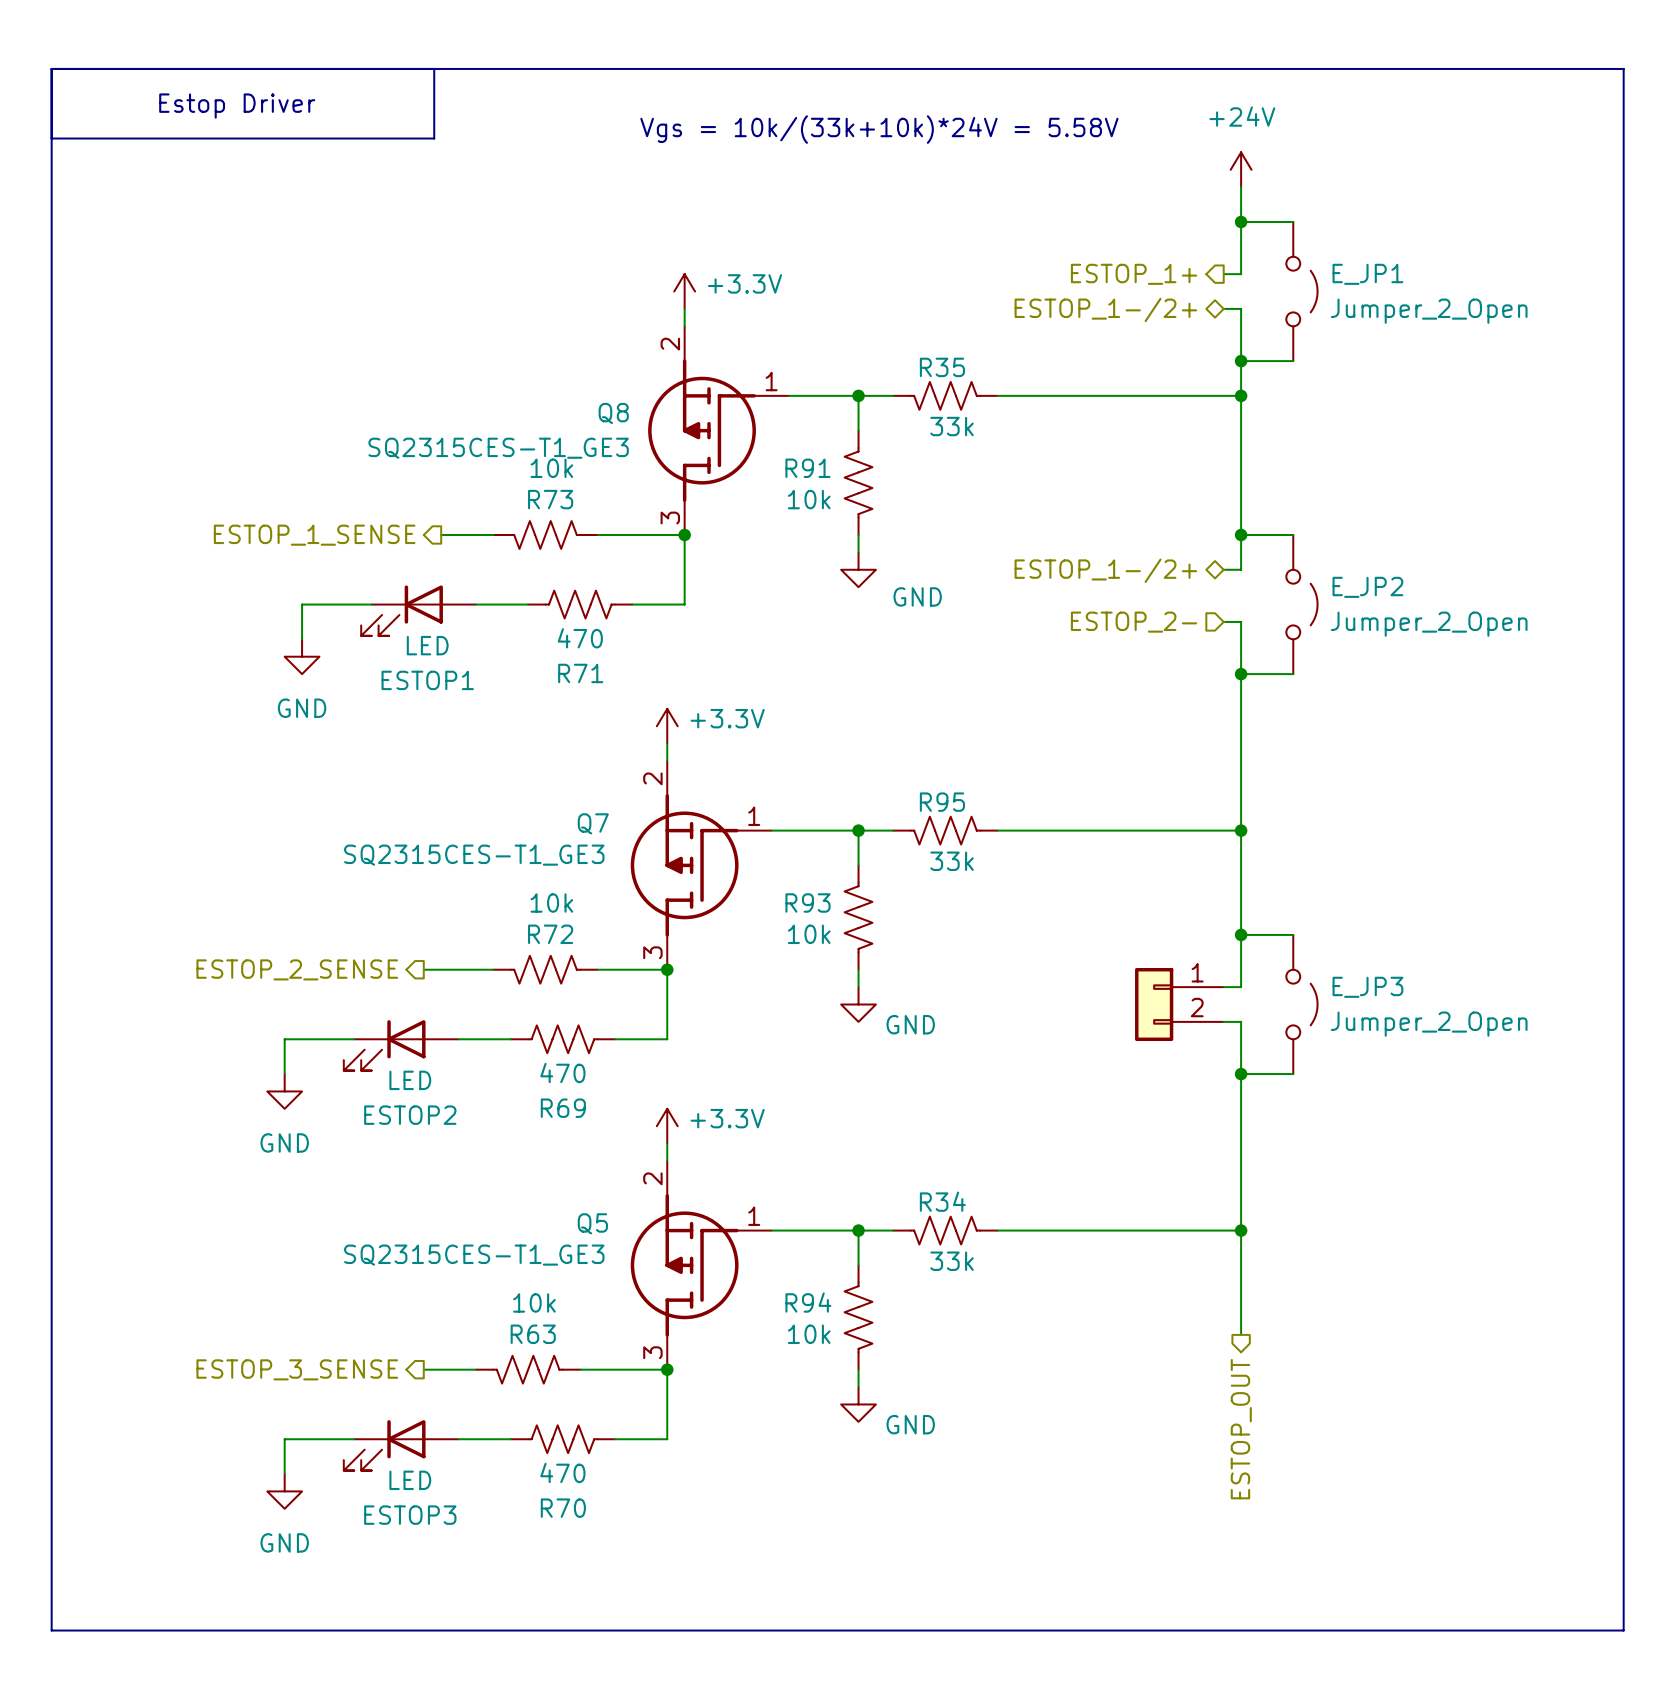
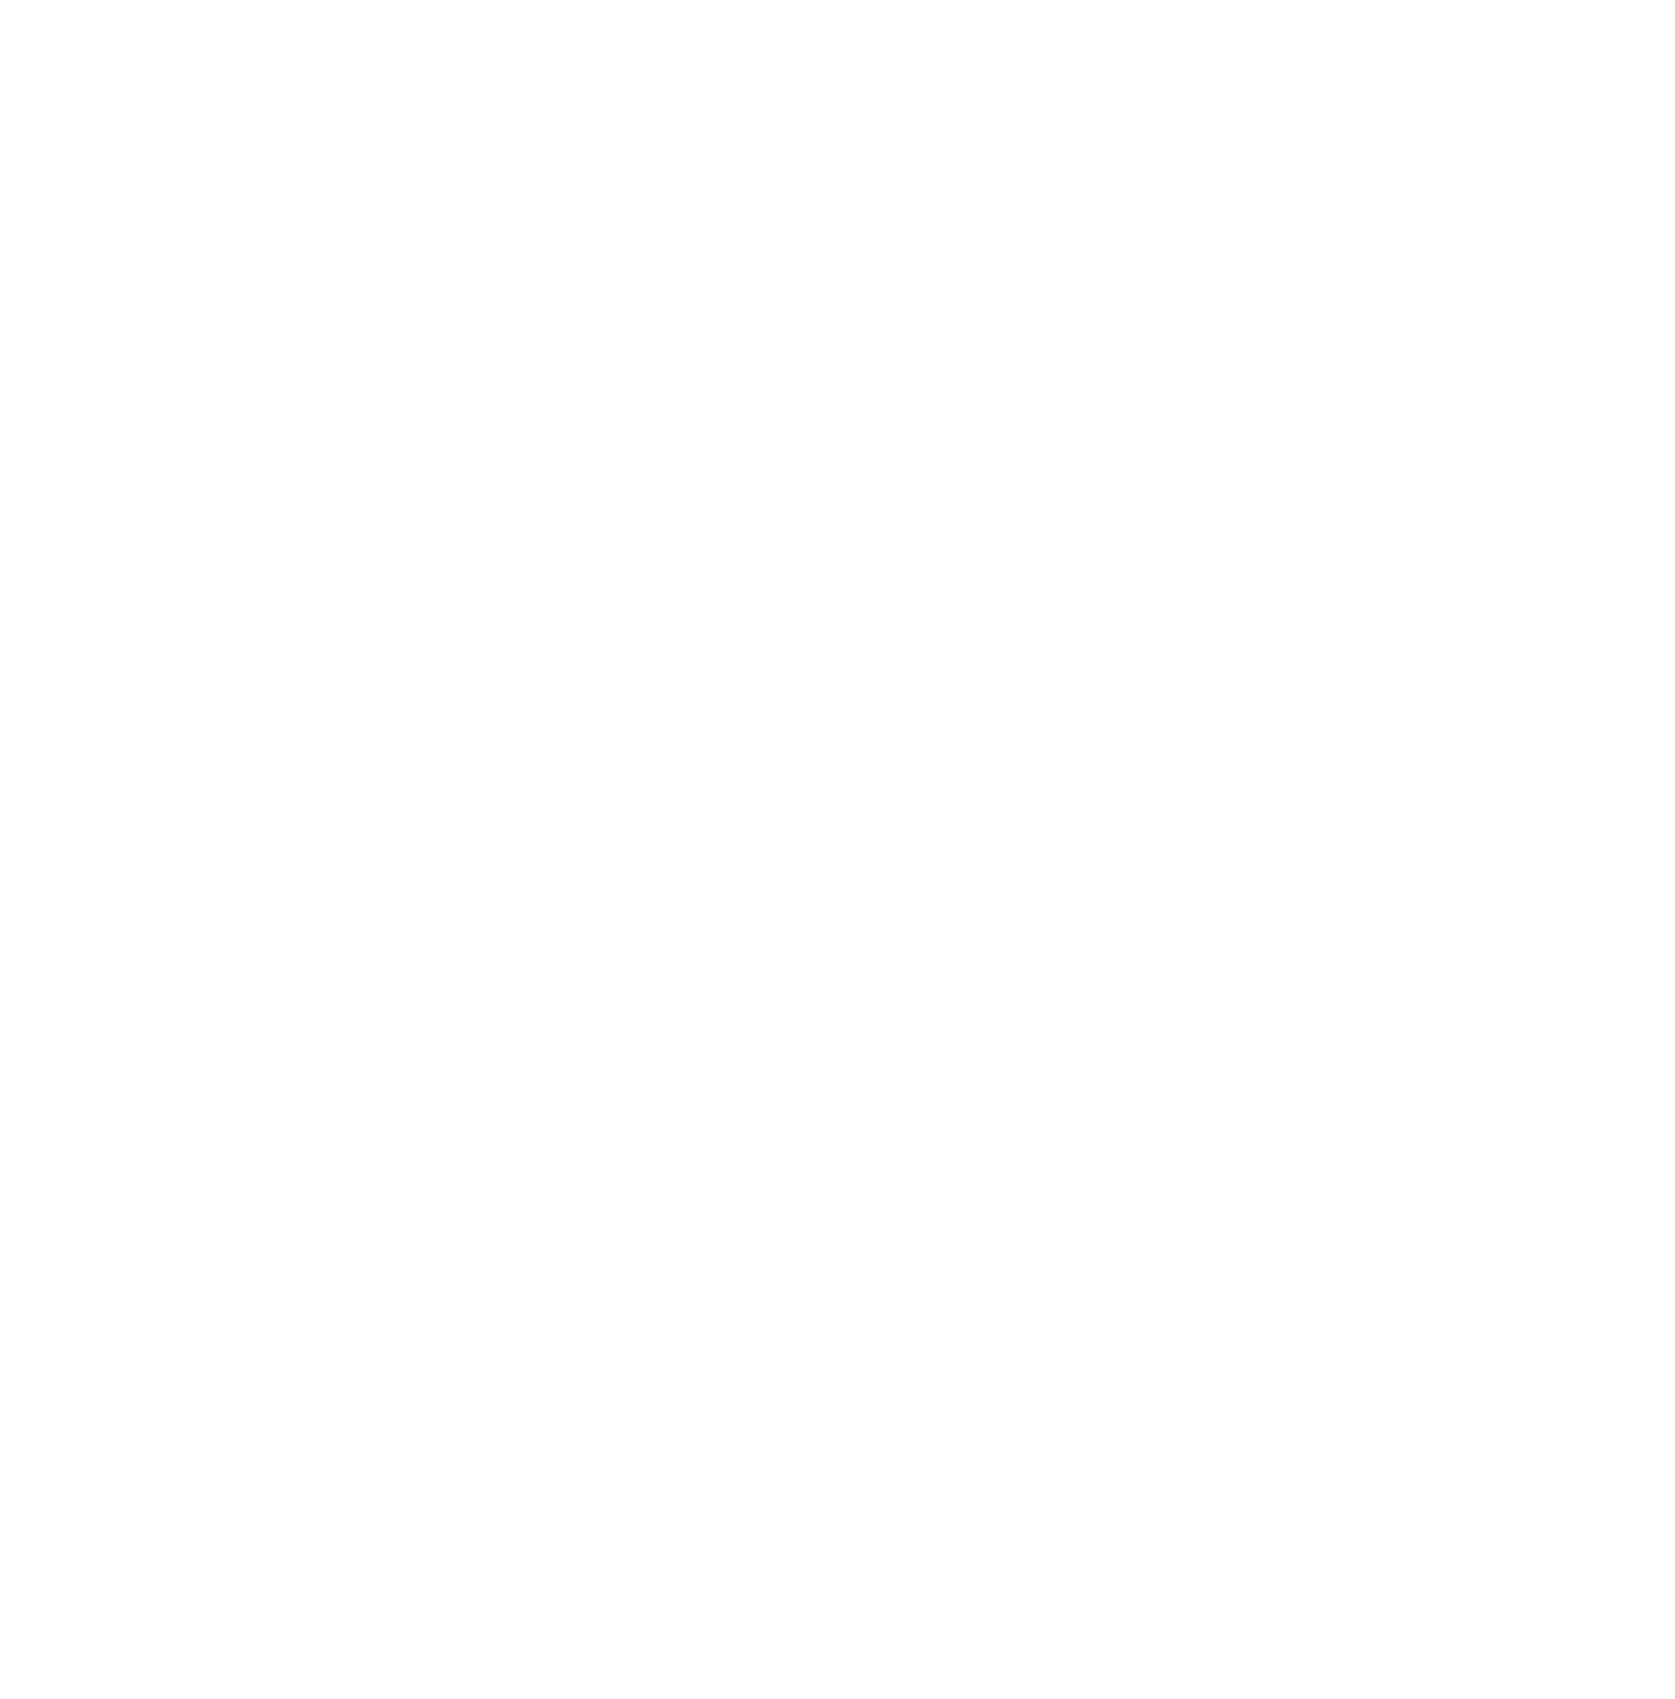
line: (51, 68) (1623, 68) (1623, 1630) (51, 1630) (51, 68) -> none
line: (434, 68) (434, 138) (51, 138) -> none
text: Estop Driver (237, 106) -> none
text: Vgs = 10k/(33k+10k)*24V = 5.58V (879, 129) -> none
power symbol: +24V (1241, 169) -> none
wire: (1241, 187) (1241, 274) (1223, 274) -> none
wire: (1241, 221) (1293, 221) -> none
junction: (1241, 221) -> none
hierarchical label: ESTOP_1+ (1134, 274) -> none
power symbol: +3.3V (684, 291) -> none
E_JP1: Jumper_2_Open (1301, 291) -> none
wire: (684, 308) (684, 326) -> none
wire: (1223, 308) (1241, 308) (1241, 569) (1223, 569) -> none
hierarchical label: ESTOP_1-/2+ (1105, 309) -> none
wire: (1241, 361) (1293, 361) -> none
junction: (1241, 361) -> none
wire: (788, 395) (893, 395) -> none
wire: (858, 395) (858, 430) -> none
junction: (858, 395) -> none
R35: 33k (945, 395) -> none
wire: (997, 395) (1241, 395) -> none
junction: (1241, 395) -> none
Q8: SQ2315CES-T1_GE3 (718, 430) -> none
R91: 10k (858, 482) -> none
wire: (441, 534) (493, 534) -> none
R73: 10k (545, 534) -> none
wire: (597, 534) (684, 534) (684, 604) (632, 604) -> none
junction: (684, 534) -> none
wire: (858, 534) (858, 552) -> none
wire: (1241, 534) (1293, 534) -> none
junction: (1241, 534) -> none
hierarchical label: ESTOP_1_SENSE (314, 535) -> none
power symbol: GND (858, 569) -> none
hierarchical label: ESTOP_1-/2+ (1105, 570) -> none
wire: (371, 604) (302, 604) (302, 639) -> none
wire: (475, 604) (528, 604) -> none
R71: 470 (580, 604) -> none
E_JP2: Jumper_2_Open (1301, 604) -> none
ESTOP1: LED (418, 610) -> none
wire: (1223, 621) (1241, 621) (1241, 987) (1223, 987) -> none
hierarchical label: ESTOP_2- (1134, 622) -> none
power symbol: GND (302, 656) -> none
wire: (1241, 674) (1293, 674) -> none
junction: (1241, 674) -> none
power symbol: +3.3V (667, 726) -> none
wire: (667, 743) (667, 761) -> none
wire: (771, 830) (893, 830) -> none
wire: (858, 830) (858, 865) -> none
junction: (858, 830) -> none
R95: 33k (945, 830) -> none
wire: (997, 830) (1241, 830) -> none
junction: (1241, 830) -> none
Q7: SQ2315CES-T1_GE3 (701, 865) -> none
R93: 10k (858, 917) -> none
wire: (1241, 934) (1293, 934) -> none
junction: (1241, 934) -> none
hierarchical label: ESTOP_2_SENSE (297, 969) -> none
wire: (423, 969) (493, 969) -> none
R72: 10k (545, 969) -> none
wire: (597, 969) (667, 969) (667, 1039) (615, 1039) -> none
junction: (667, 969) -> none
wire: (858, 969) (858, 987) -> none
power symbol: GND (858, 1004) -> none
part: (1179, 1004) -> none
E_JP3: Jumper_2_Open (1301, 1004) -> none
wire: (1223, 1021) (1241, 1021) (1241, 1334) -> none
wire: (354, 1039) (284, 1039) (284, 1074) -> none
wire: (458, 1039) (510, 1039) -> none
R69: 470 (562, 1039) -> none
ESTOP2: LED (401, 1045) -> none
wire: (1241, 1074) (1293, 1074) -> none
junction: (1241, 1074) -> none
power symbol: GND (284, 1091) -> none
power symbol: +3.3V (667, 1126) -> none
wire: (667, 1143) (667, 1161) -> none
wire: (771, 1230) (893, 1230) -> none
wire: (858, 1230) (858, 1265) -> none
junction: (858, 1230) -> none
R34: 33k (945, 1230) -> none
wire: (997, 1230) (1241, 1230) -> none
junction: (1241, 1230) -> none
Q5: SQ2315CES-T1_GE3 (701, 1265) -> none
R94: 10k (858, 1317) -> none
hierarchical label: ESTOP_3_SENSE (297, 1369) -> none
wire: (423, 1369) (475, 1369) -> none
R63: 10k (528, 1369) -> none
wire: (580, 1369) (667, 1369) (667, 1439) (615, 1439) -> none
junction: (667, 1369) -> none
wire: (858, 1369) (858, 1387) -> none
power symbol: GND (858, 1404) -> none
hierarchical label: ESTOP_OUT (1241, 1429) -> none
wire: (354, 1439) (284, 1439) (284, 1474) -> none
wire: (458, 1439) (510, 1439) -> none
R70: 470 (562, 1439) -> none
ESTOP3: LED (401, 1445) -> none
power symbol: GND (284, 1491) -> none

